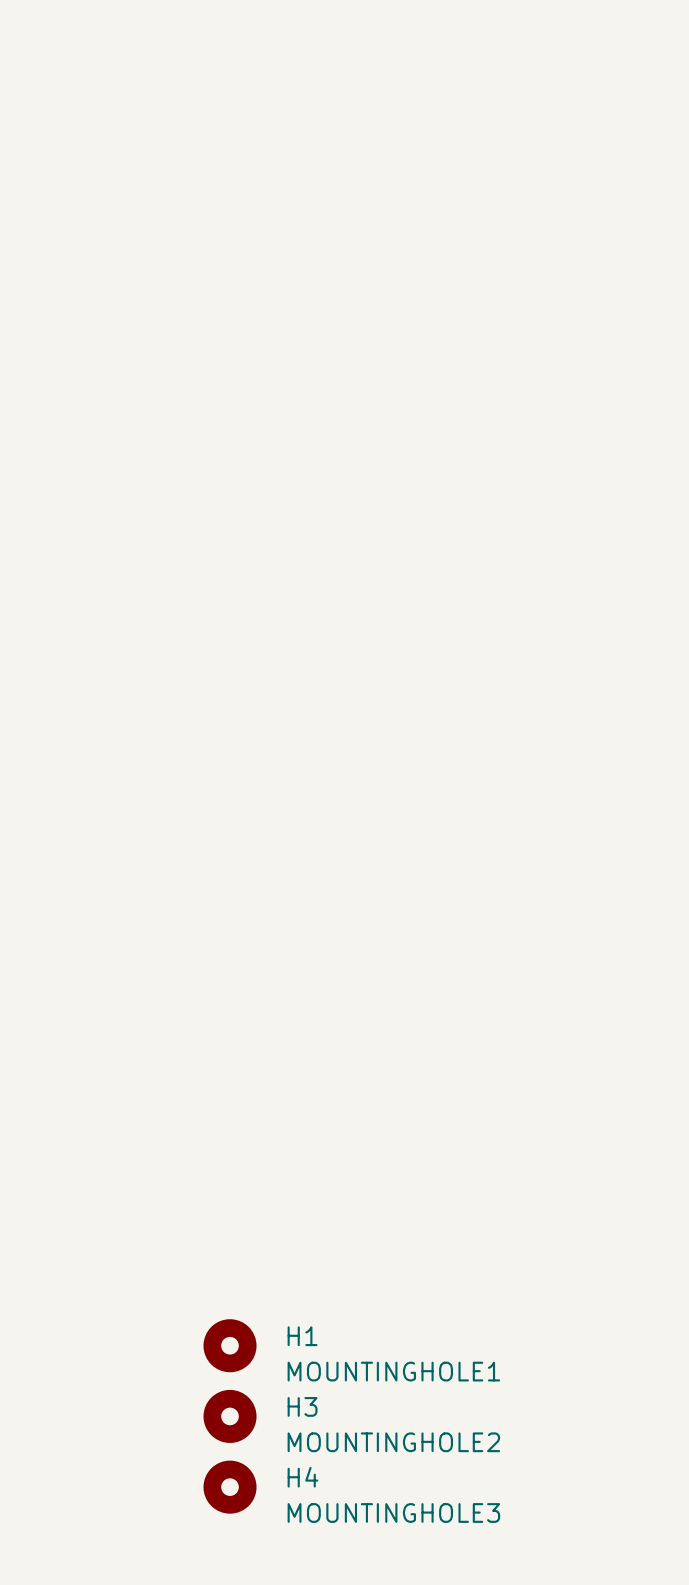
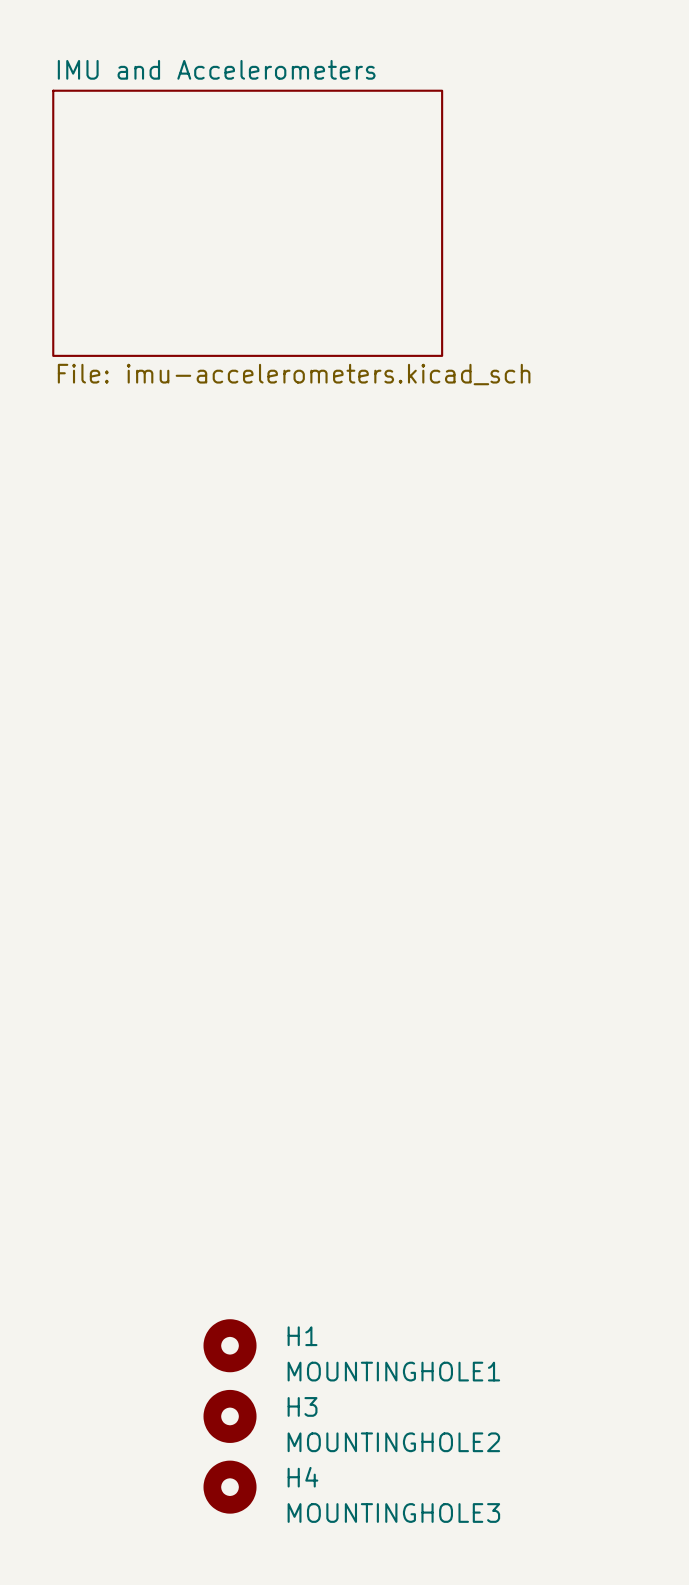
sheet IMU and Accelerometers: none -> File: imu-accelerometers.kicad_sch (247, 223)

